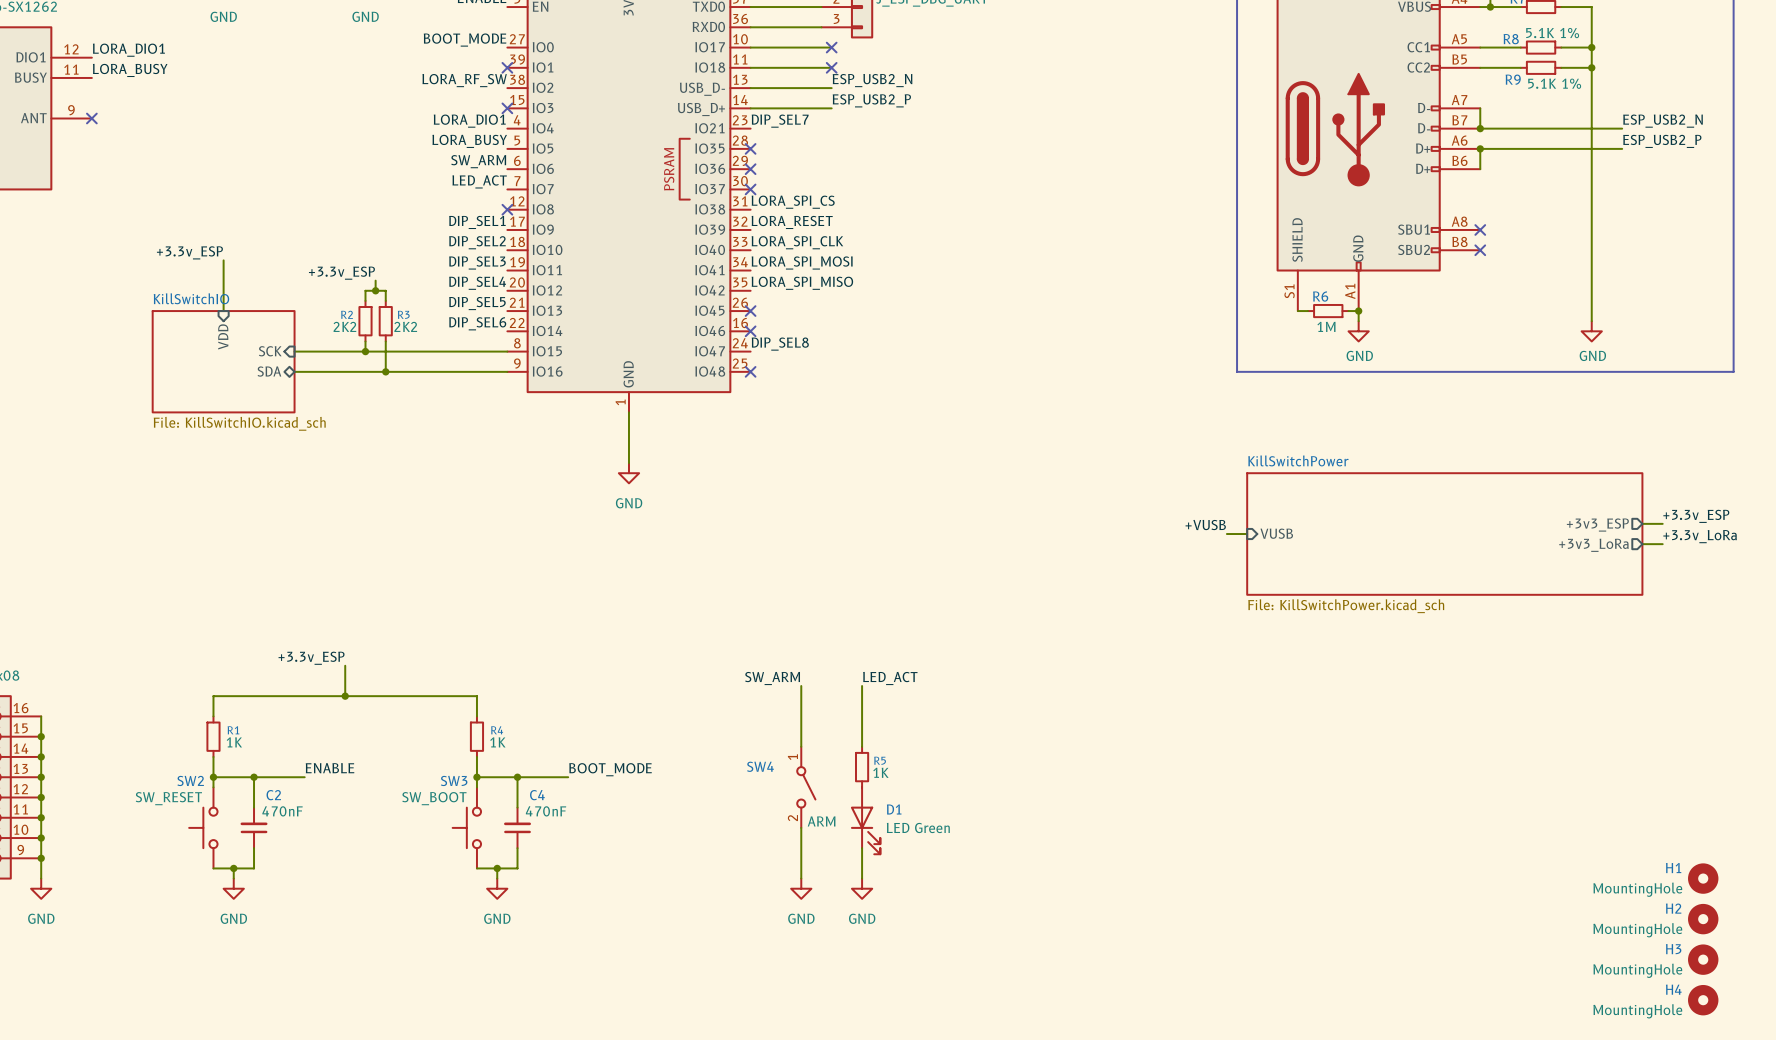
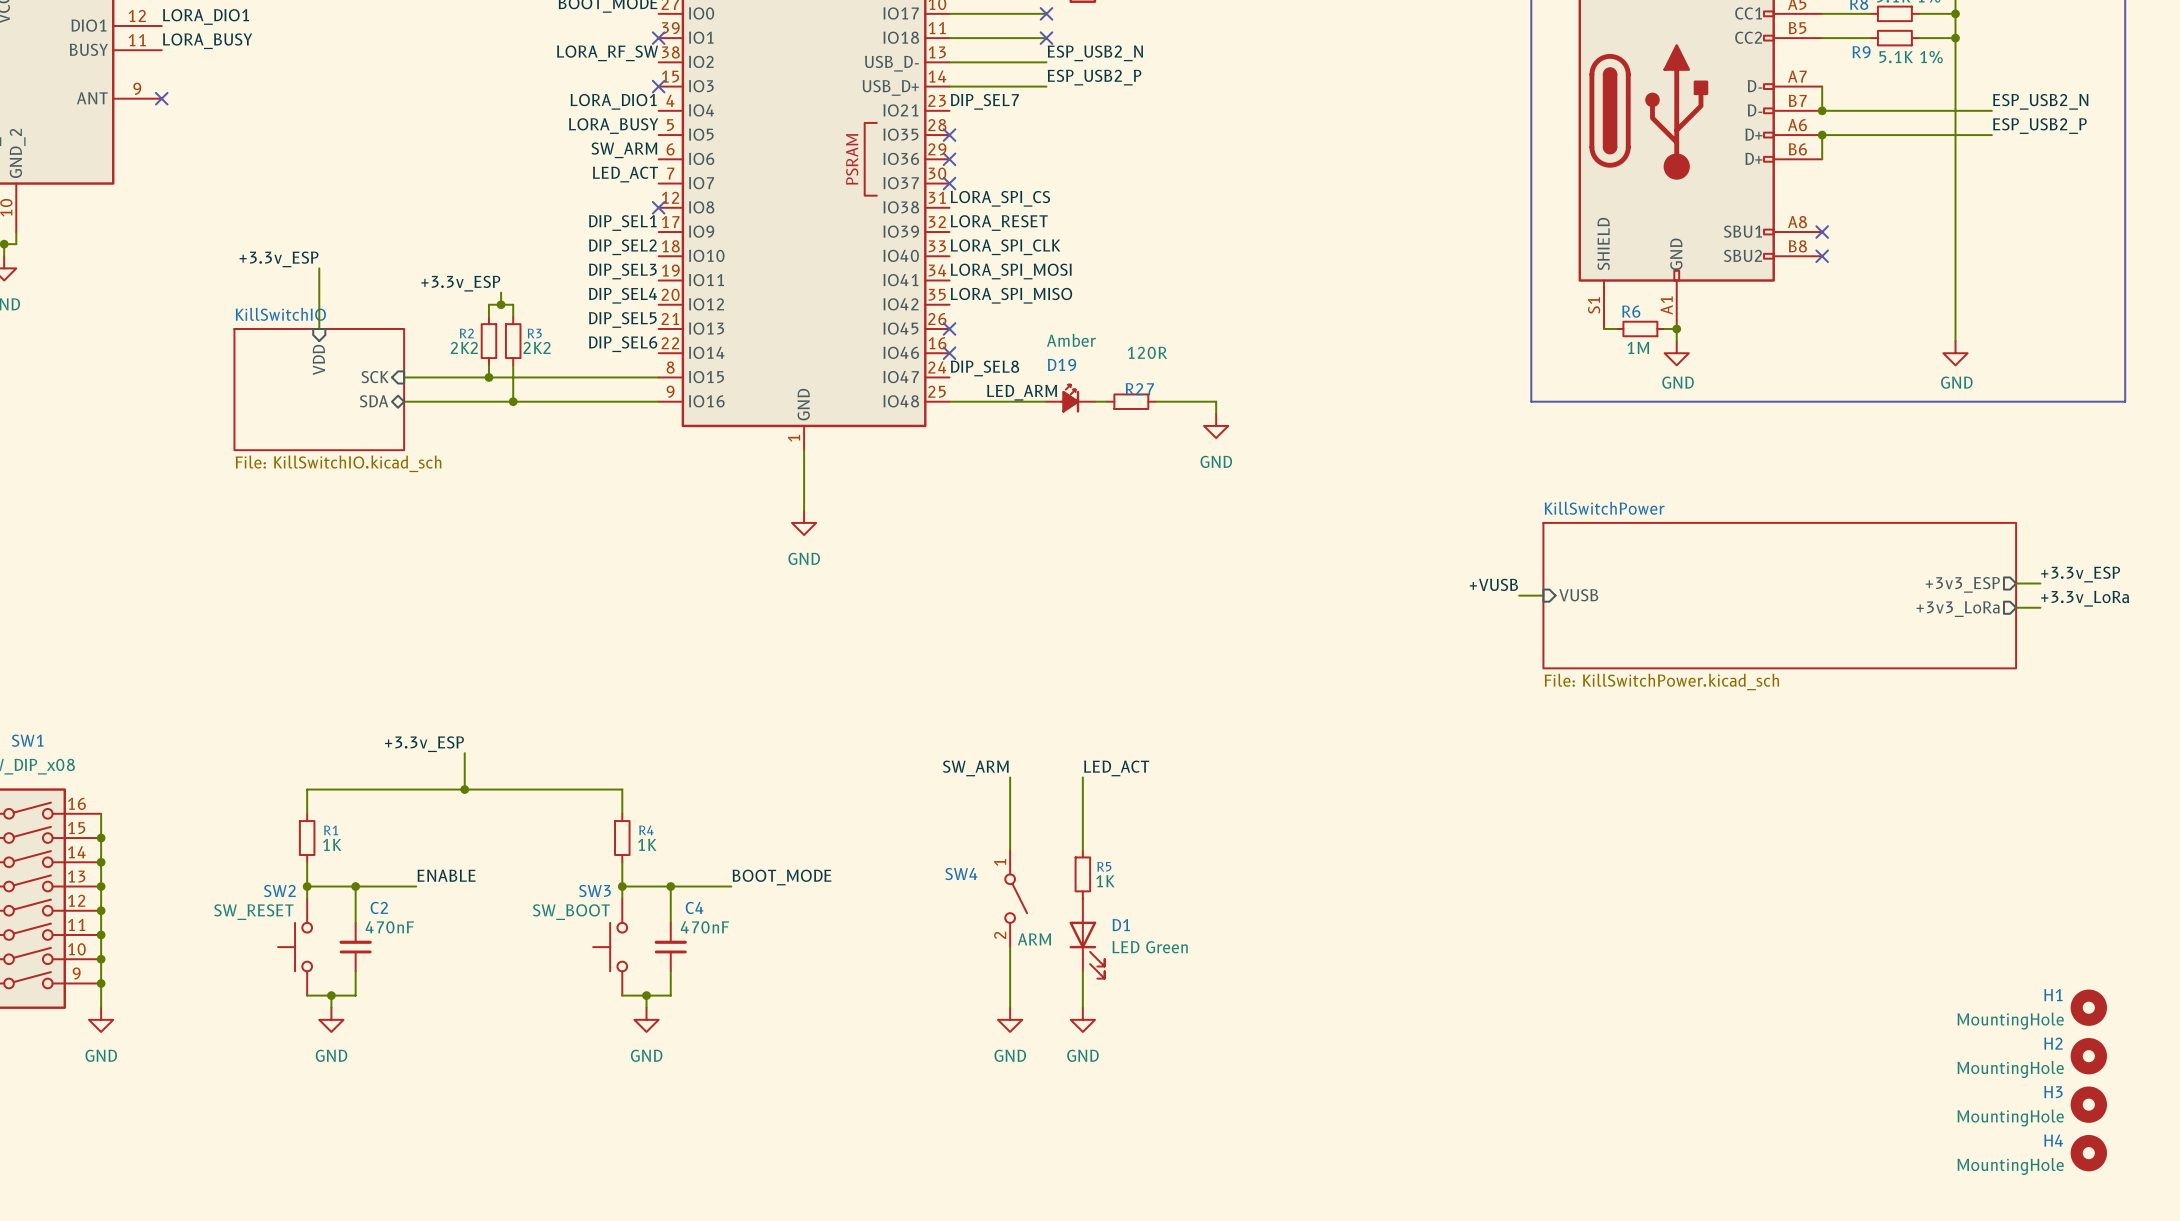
label: none -> LED_ARM (1022, 392)
D19: none -> Amber (1070, 398)
wire: none -> (949, 401) (1046, 401)
no-connect mark: (750, 371) -> none
wire: none -> (1094, 401) (1107, 401)
R27: none -> 120R (1131, 401)
wire: none -> (1155, 401) (1216, 401) (1216, 413)
power symbol: none -> GND (1216, 425)

